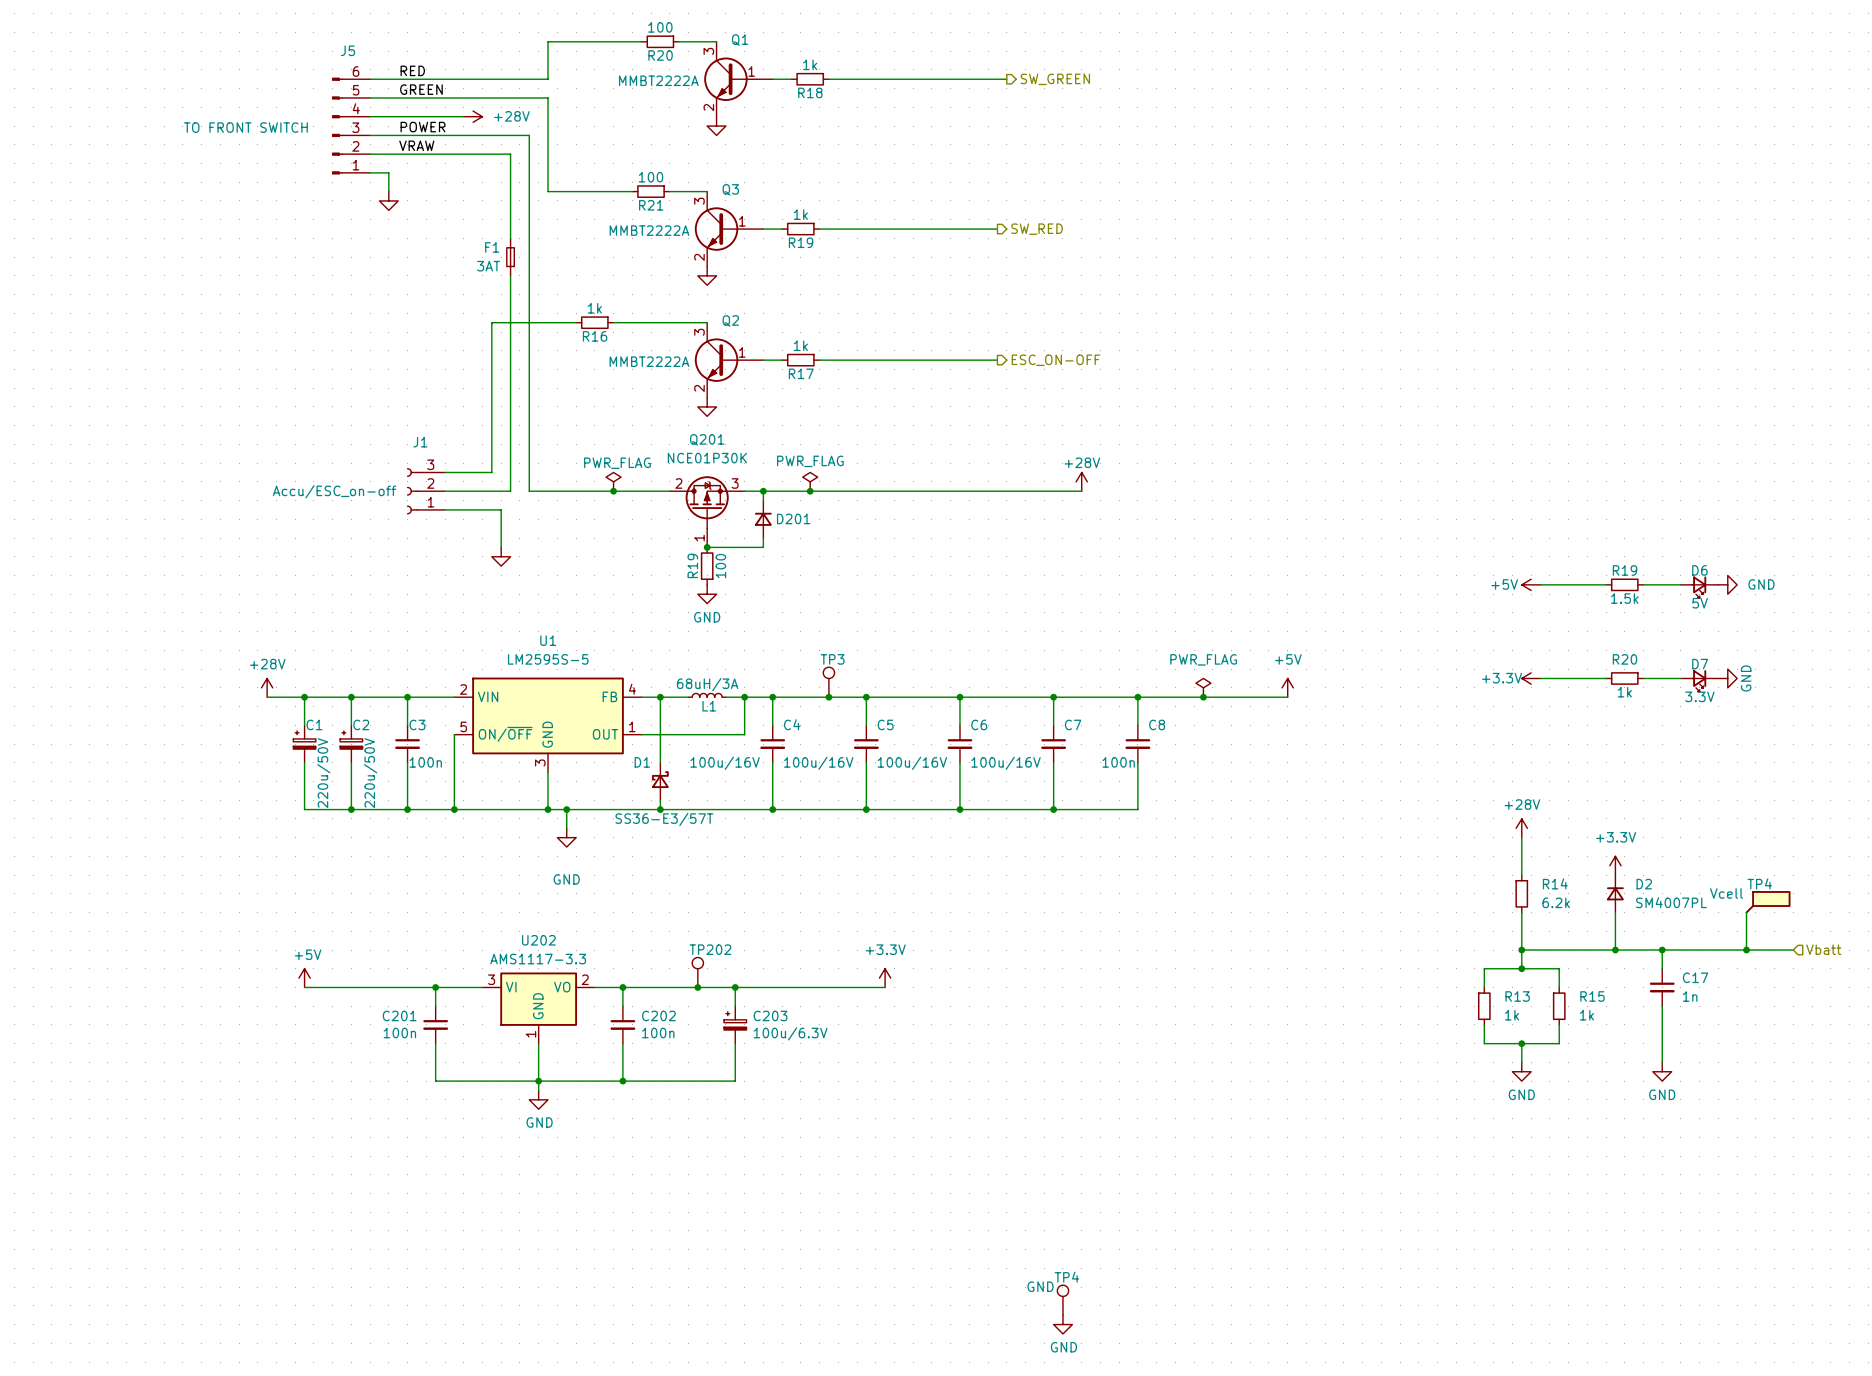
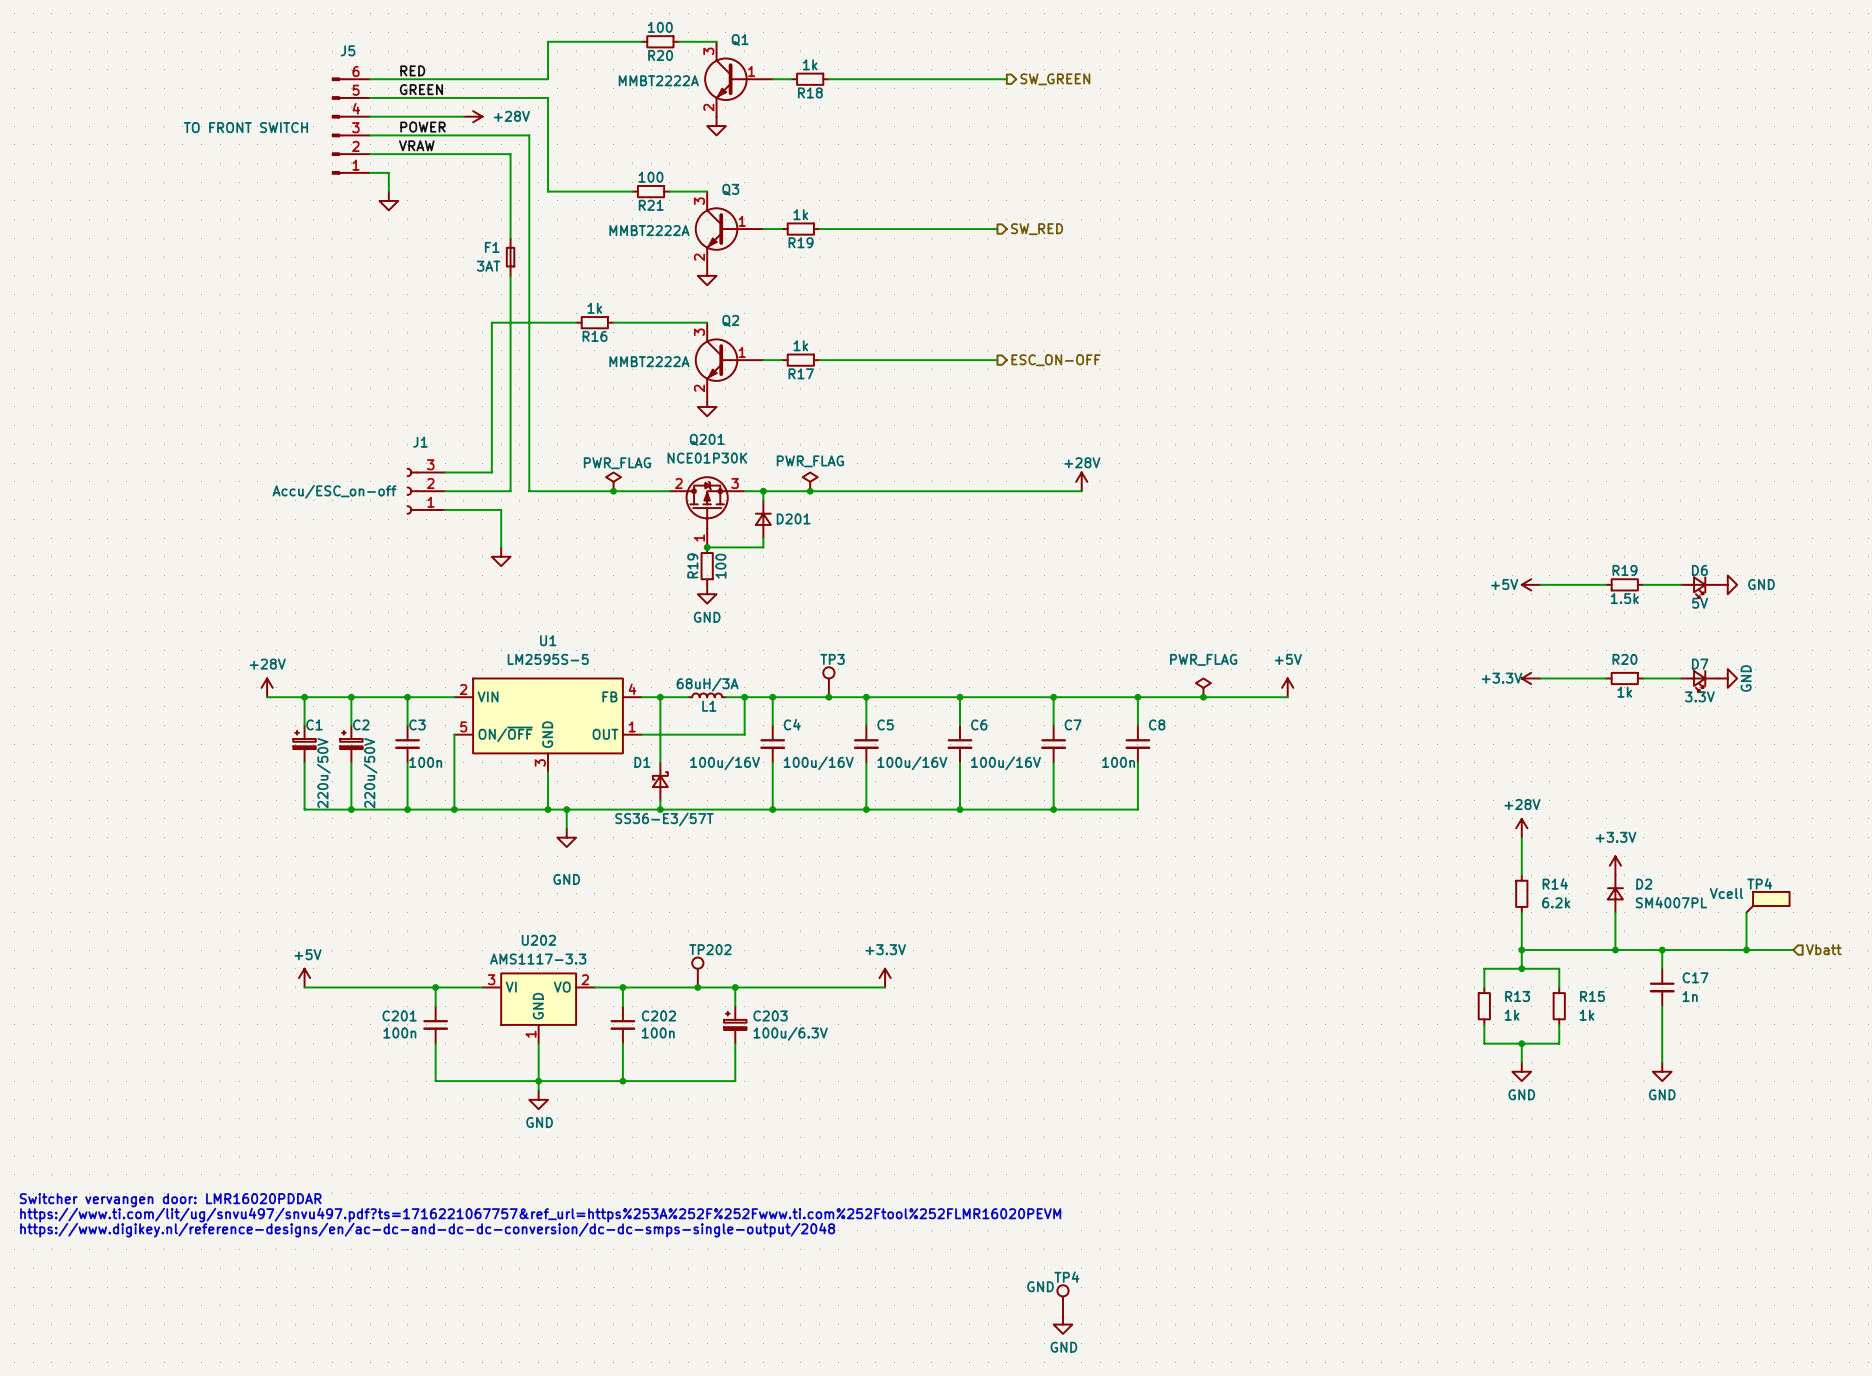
text: none -> Switcher vervangen door: LMR16020PDDAR (170, 1200)
text: none -> https://www.ti.com/lit/ug/snvu497/snvu497.pdf?ts=1716221067757&ref_url=https%253A%252F%252Fwww.ti.com%252Ftool%252FLMR16020PEVM (540, 1215)
text: none -> https://www.digikey.nl/reference-designs/en/ac-dc-and-dc-dc-conversion/dc-dc-smps-single-output/2048 (427, 1230)

